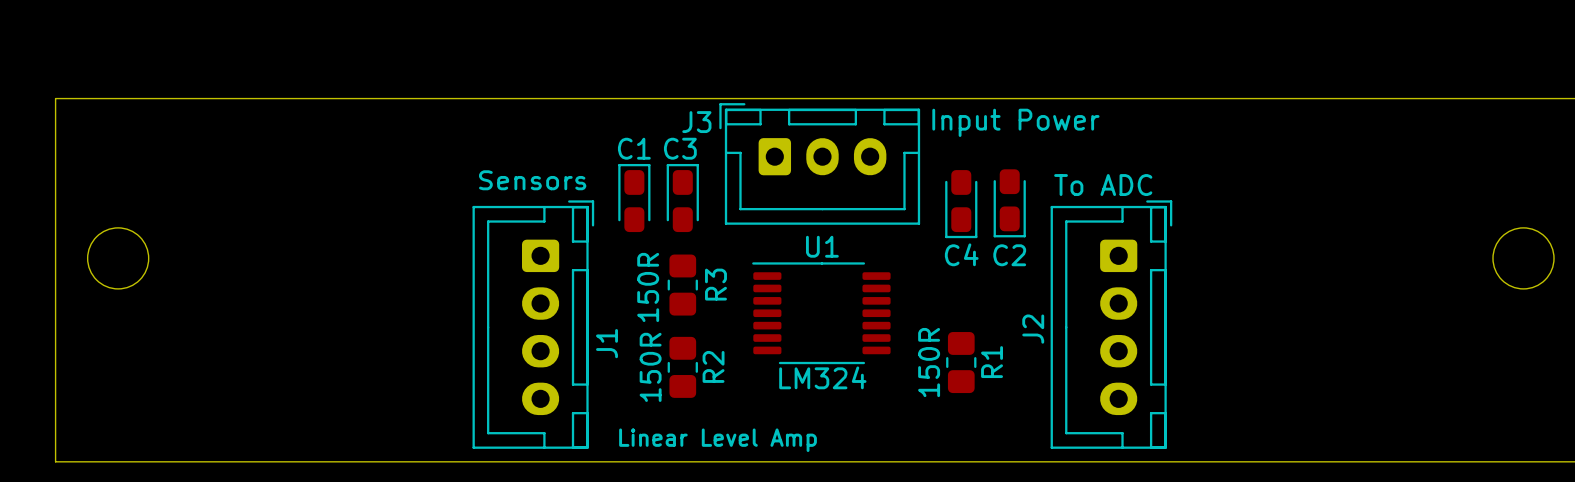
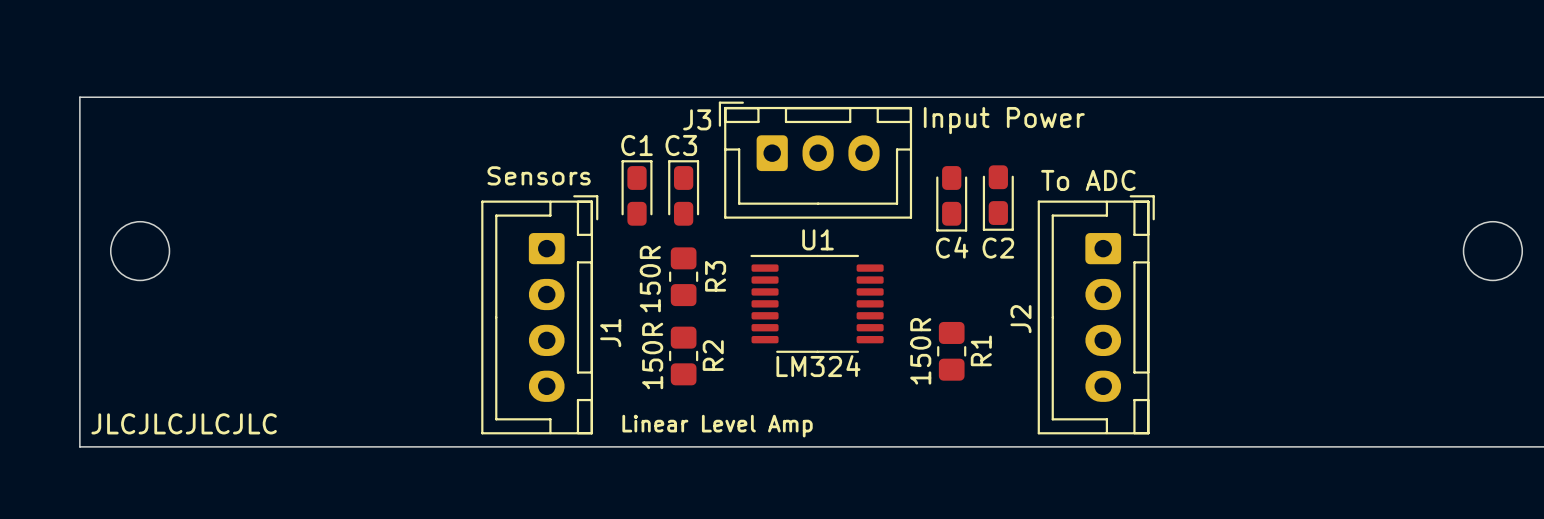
text: none -> JLCJLCJLCJLC (184, 423)

